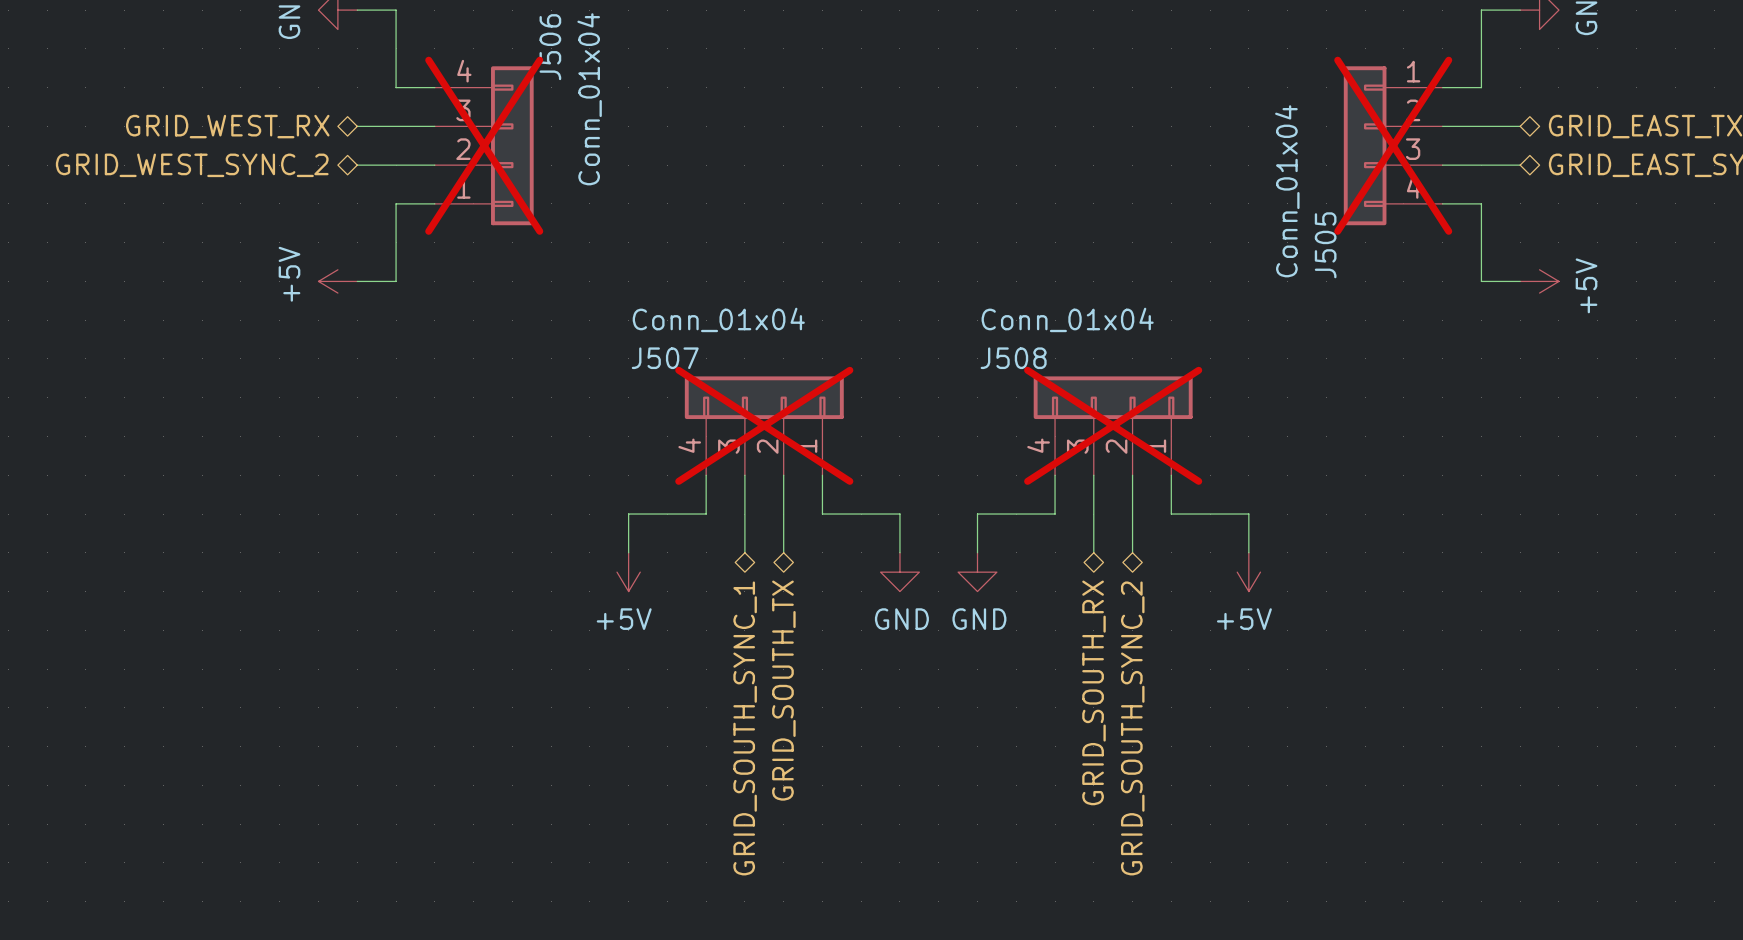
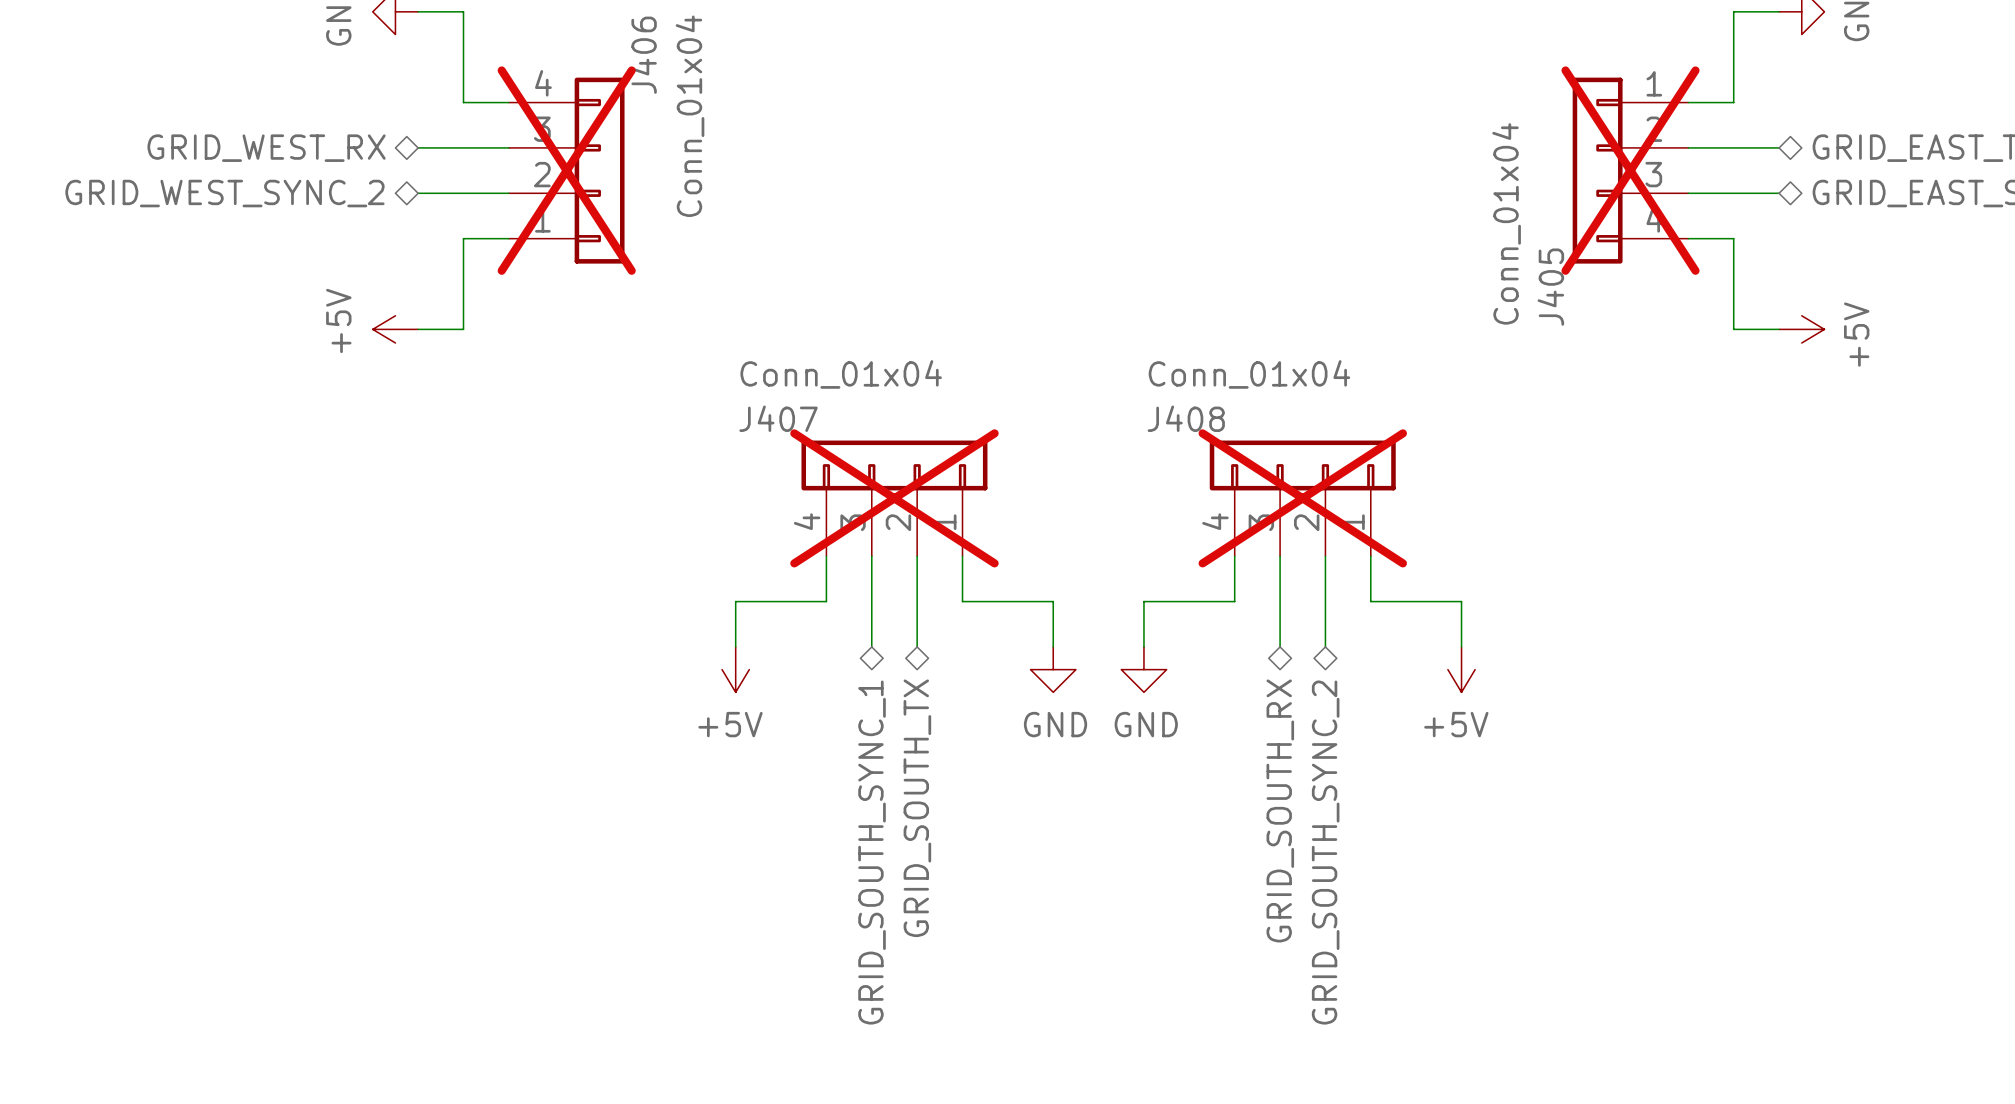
J506 name: J506 (550, 47) -> J406 (643, 55)
J505 name: J505 (1325, 245) -> J405 (1550, 287)
J507 name: J507 (665, 358) -> J407 (778, 418)
J508 name: J508 (1013, 358) -> J408 (1186, 418)

